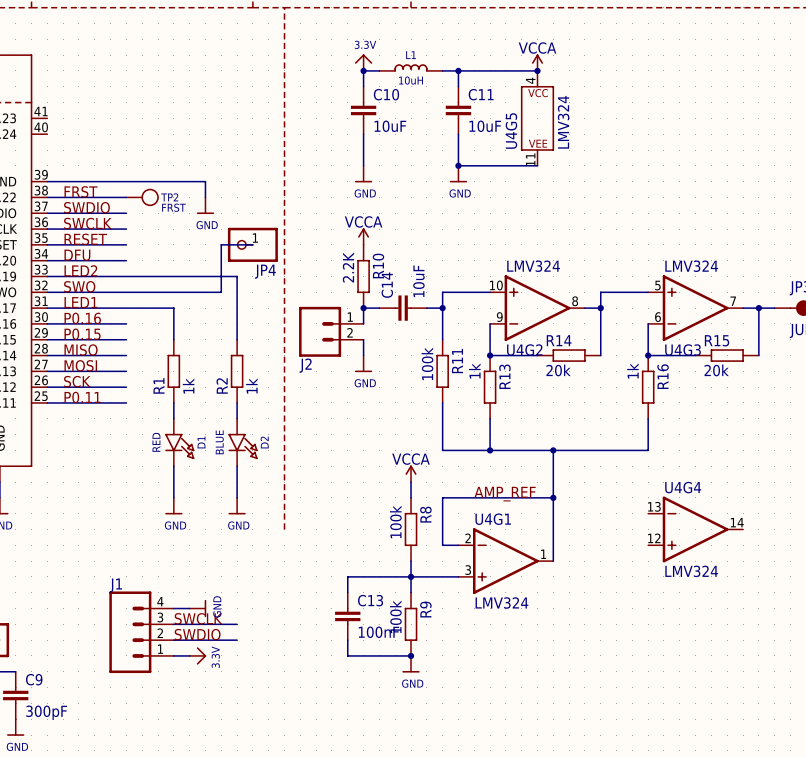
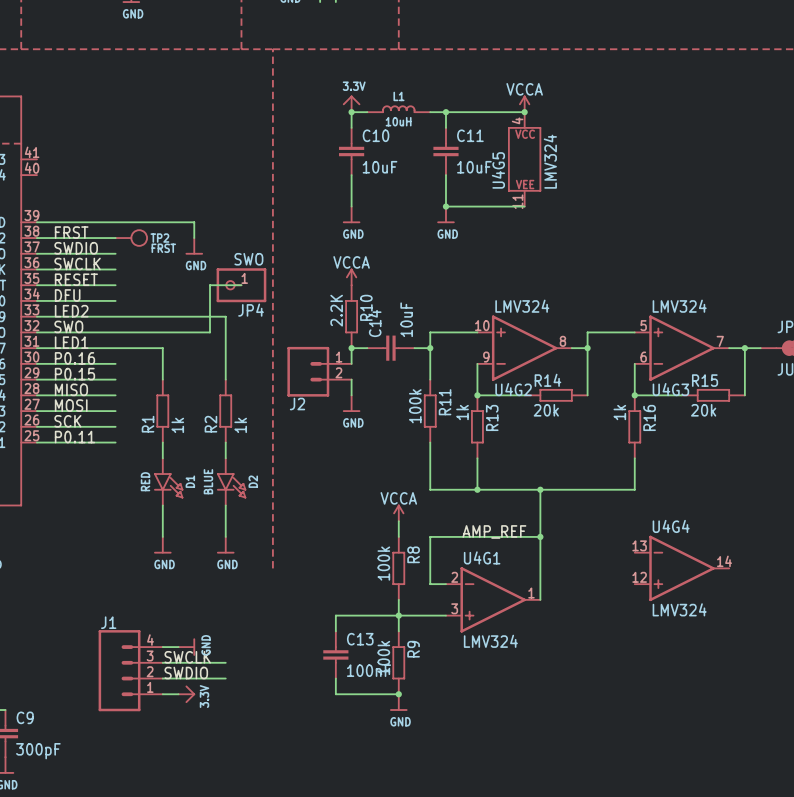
JP4 value: none -> SWO (248, 259)

